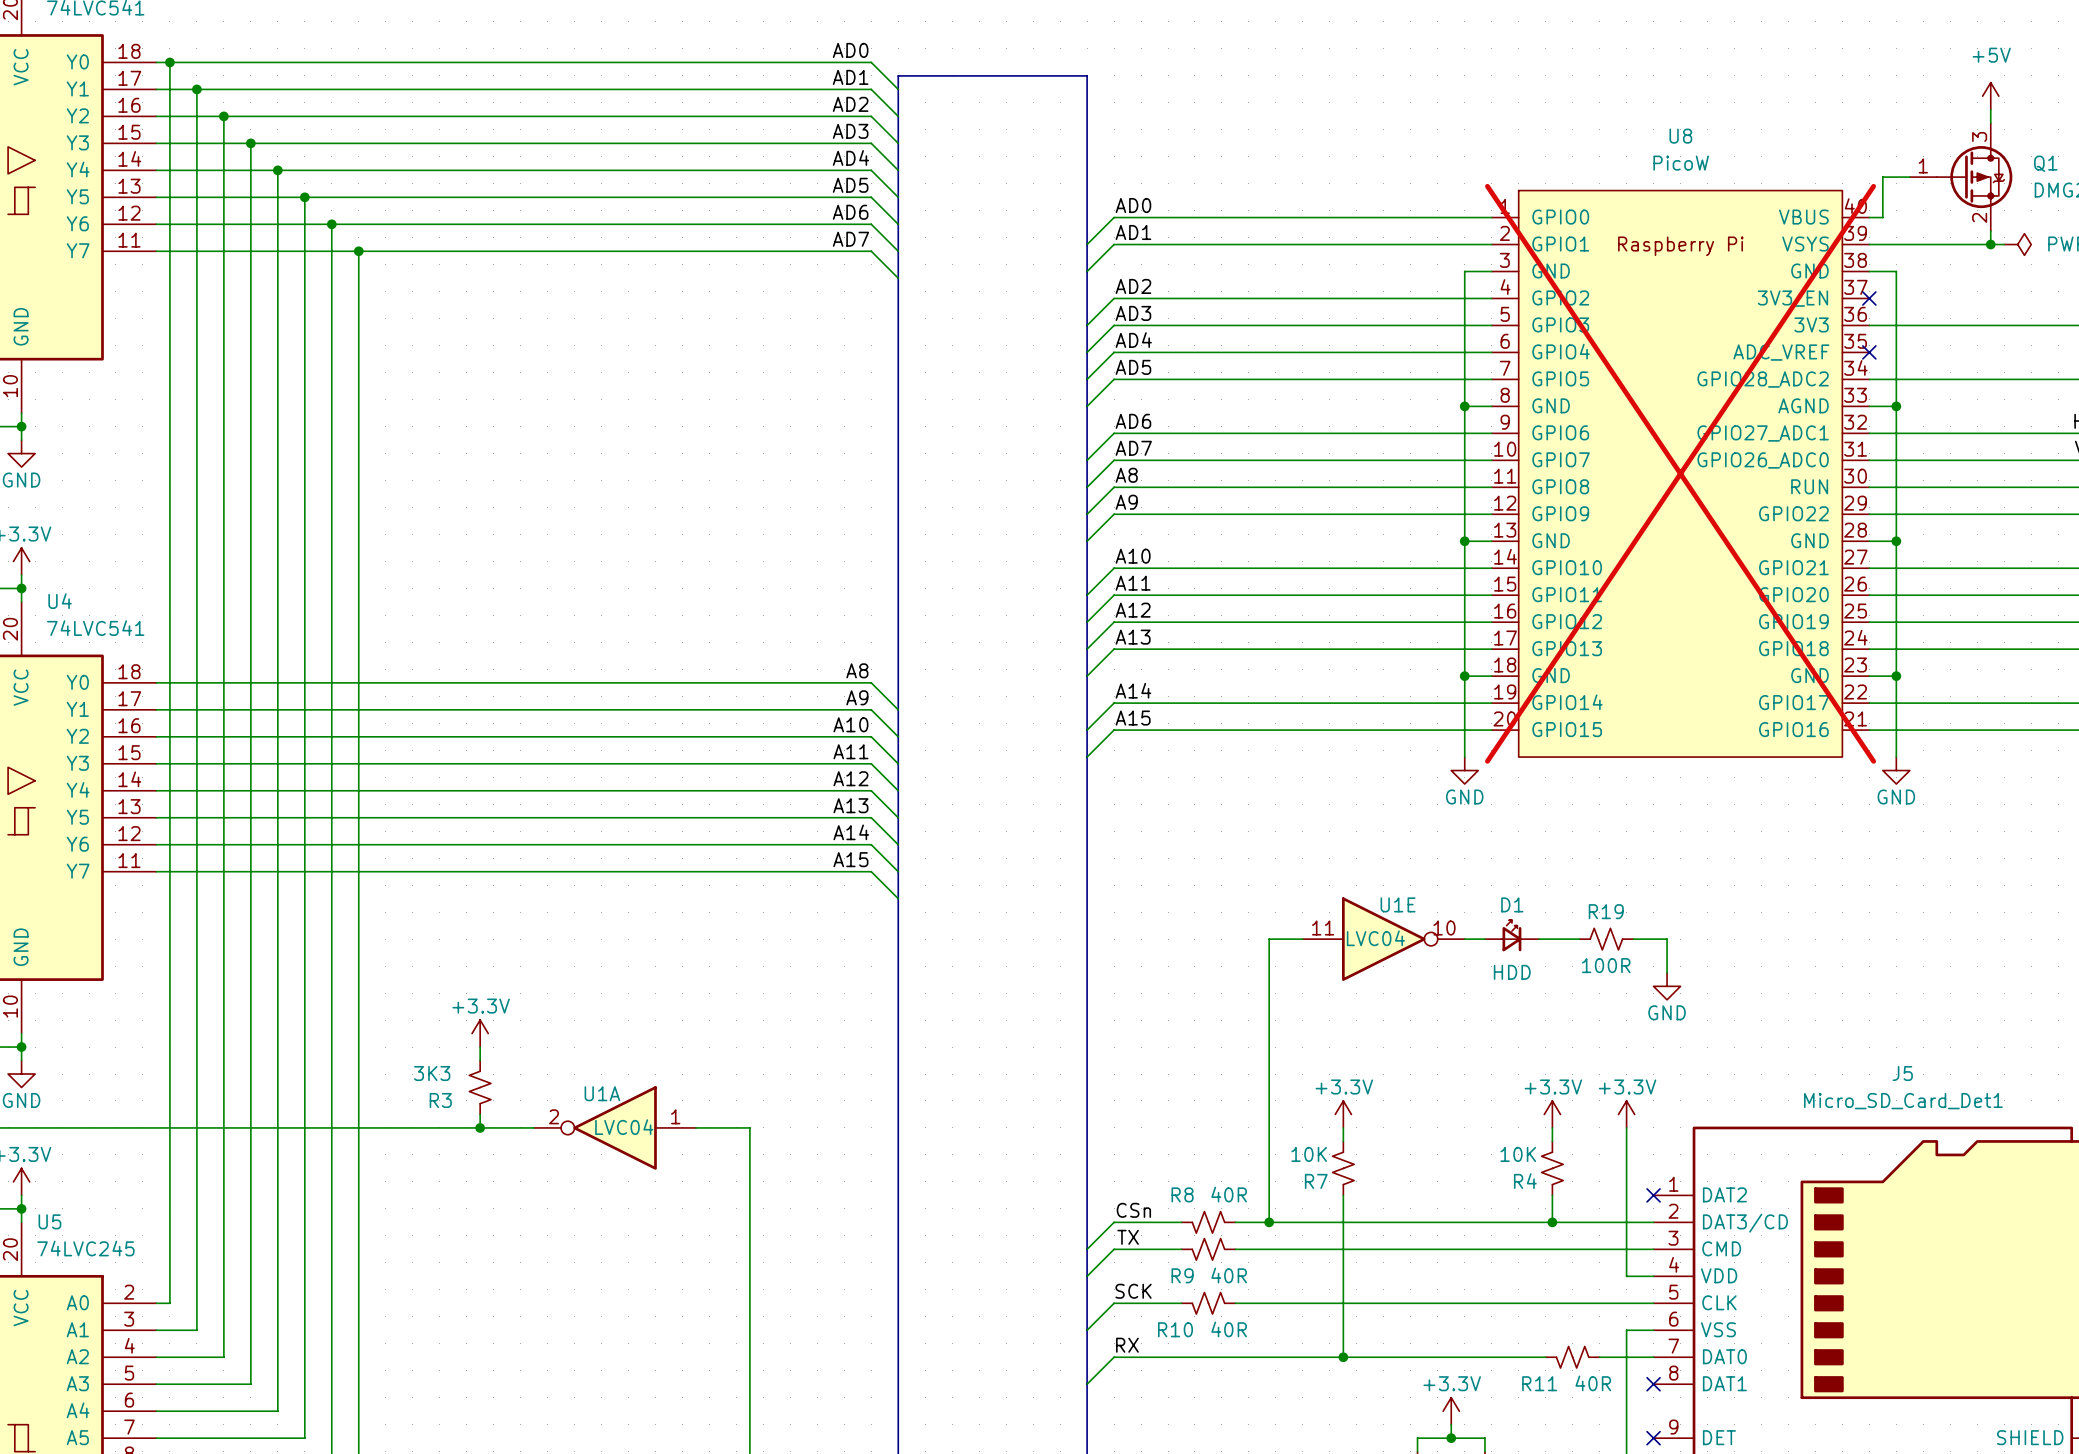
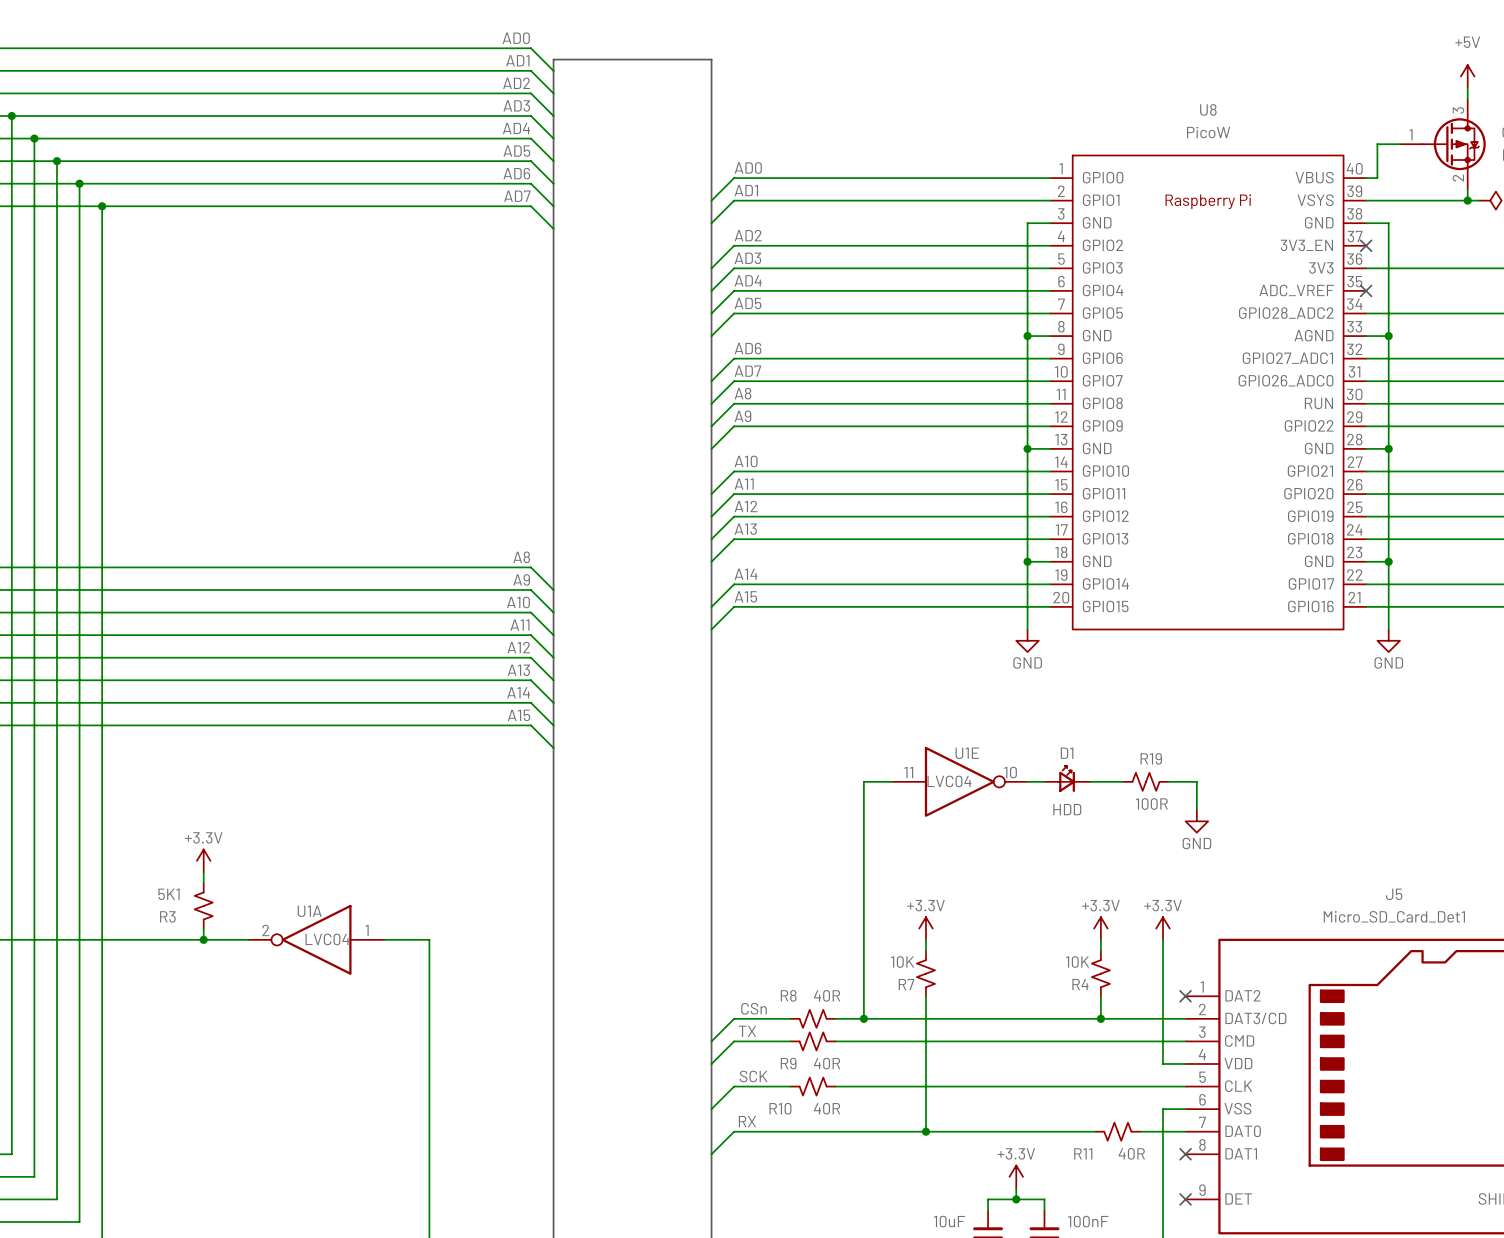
U8 do-not-place cross: (1680, 473) -> none
R3 value: 3K3 (432, 1073) -> 5K1 (169, 894)

